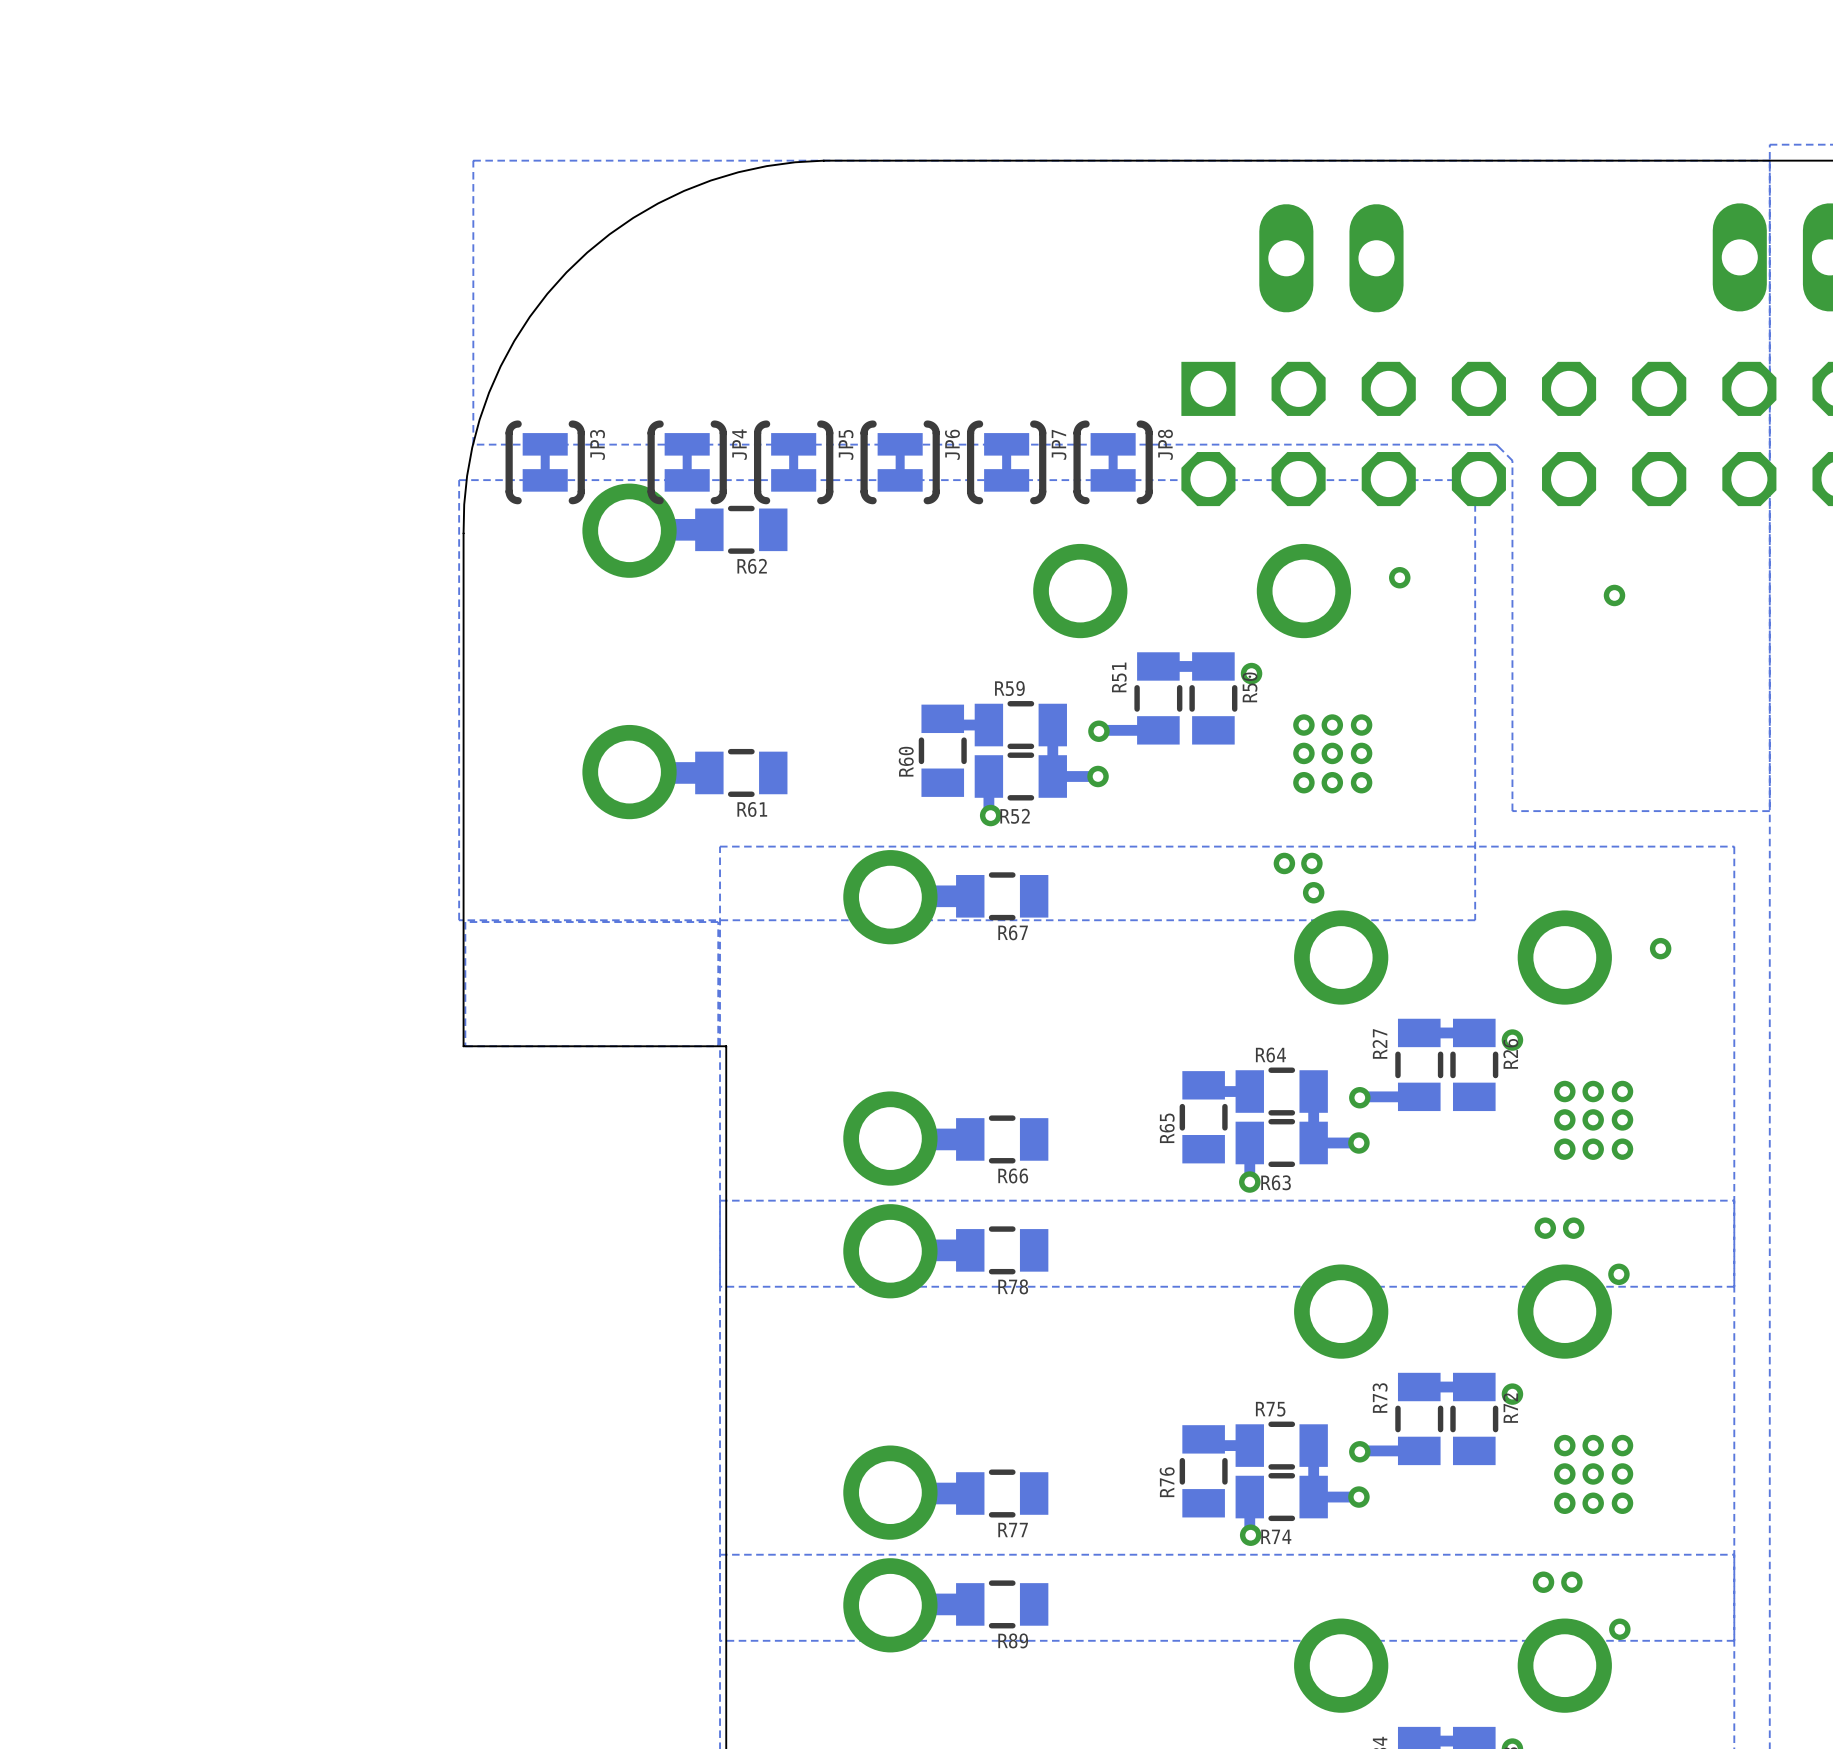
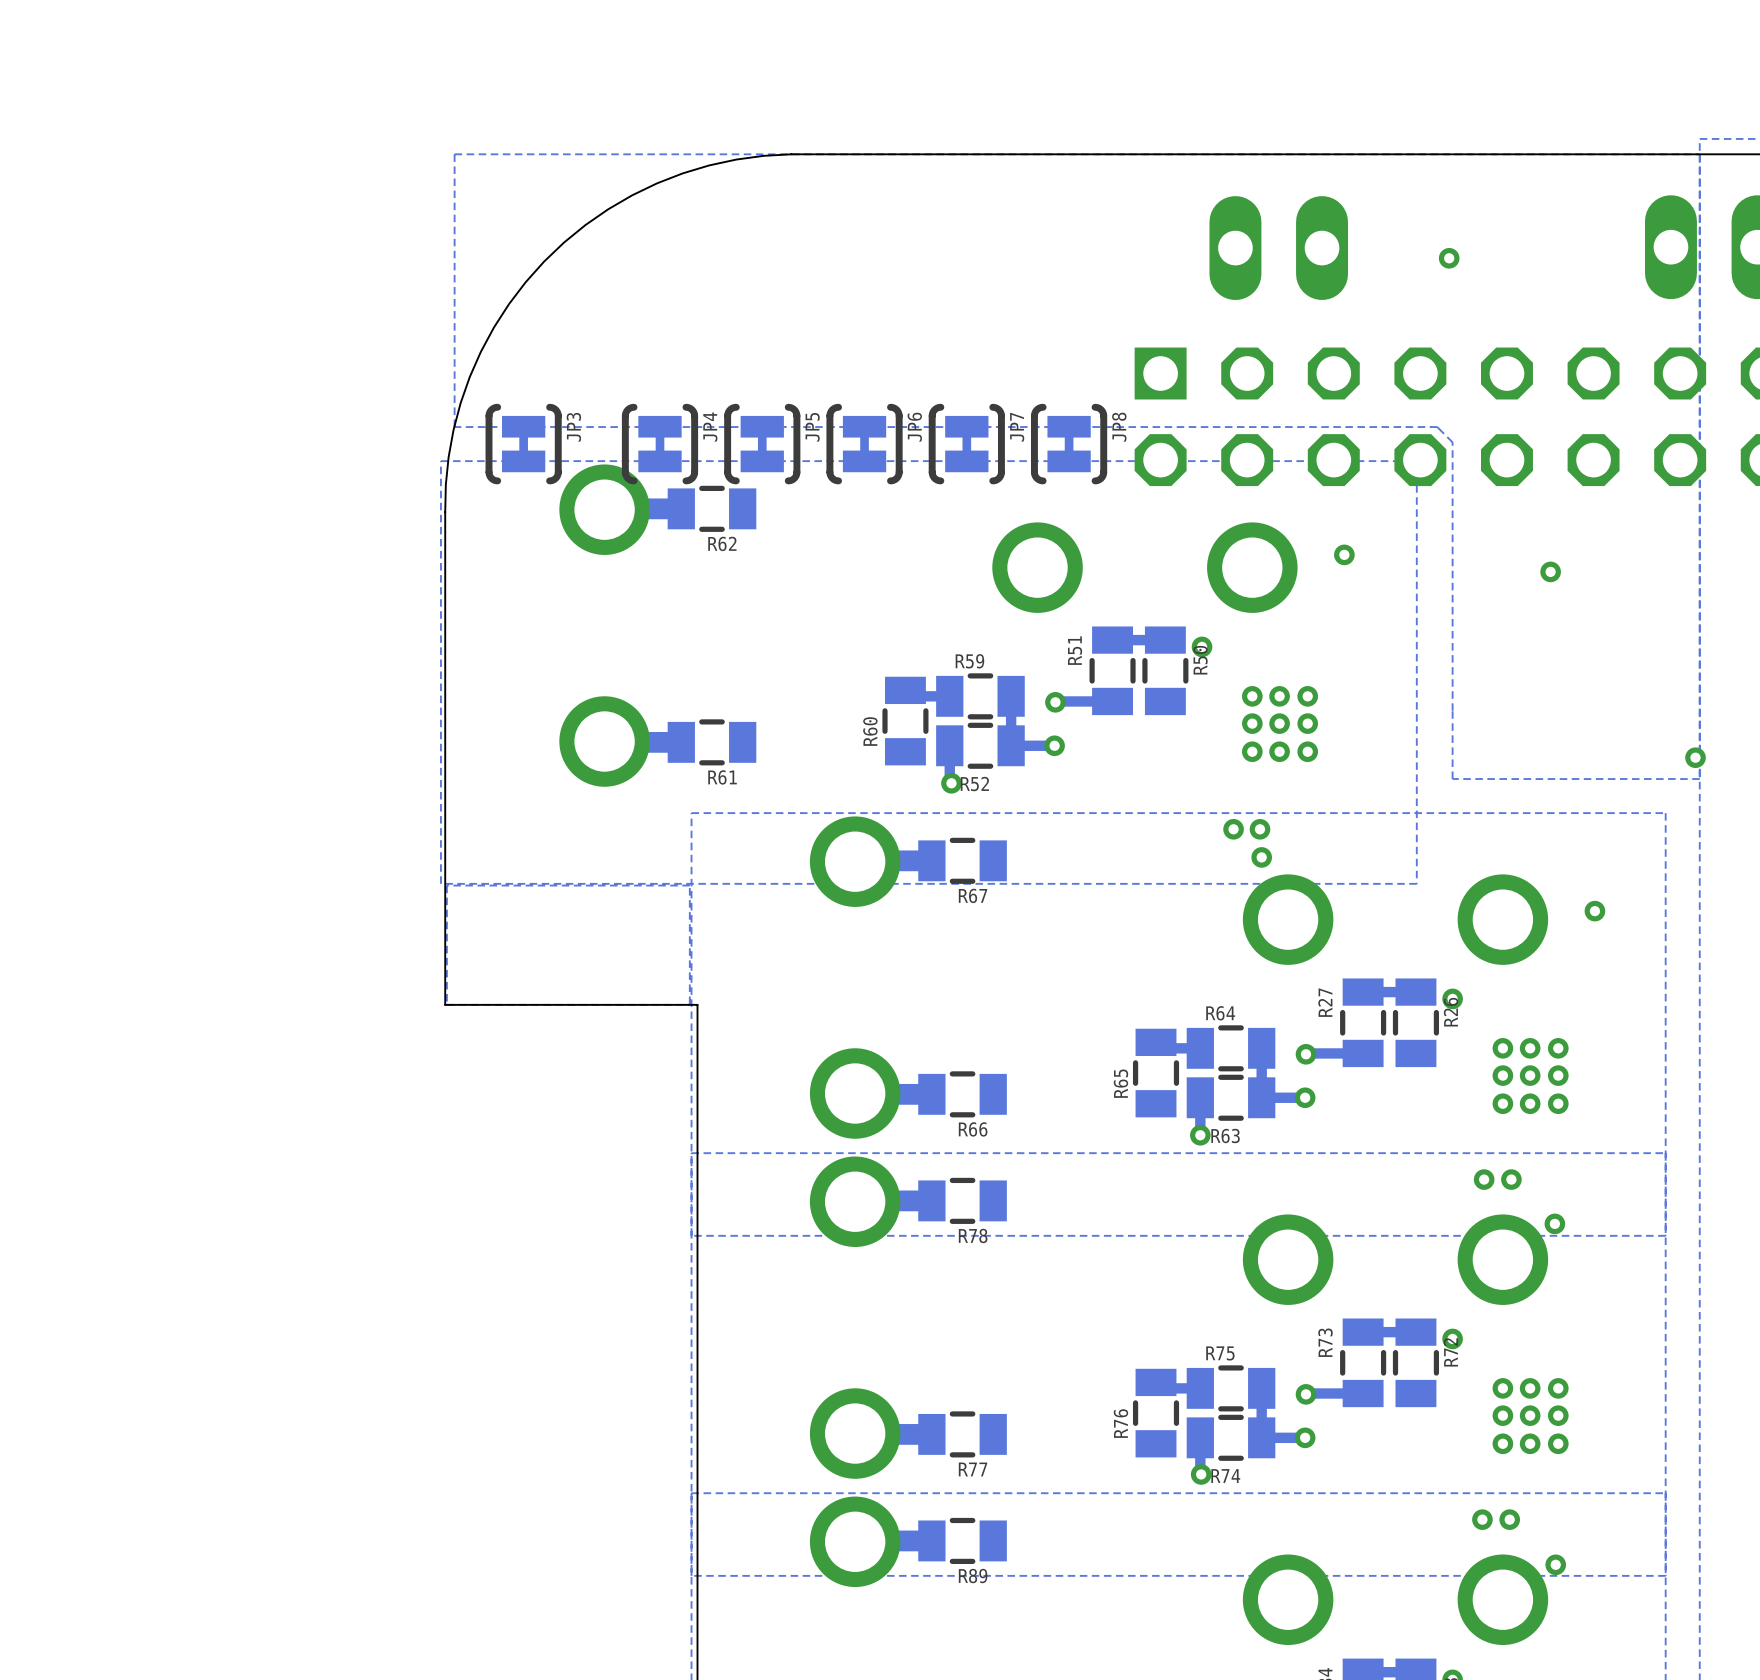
via: none -> (1449, 258)
via: none -> (1695, 757)

